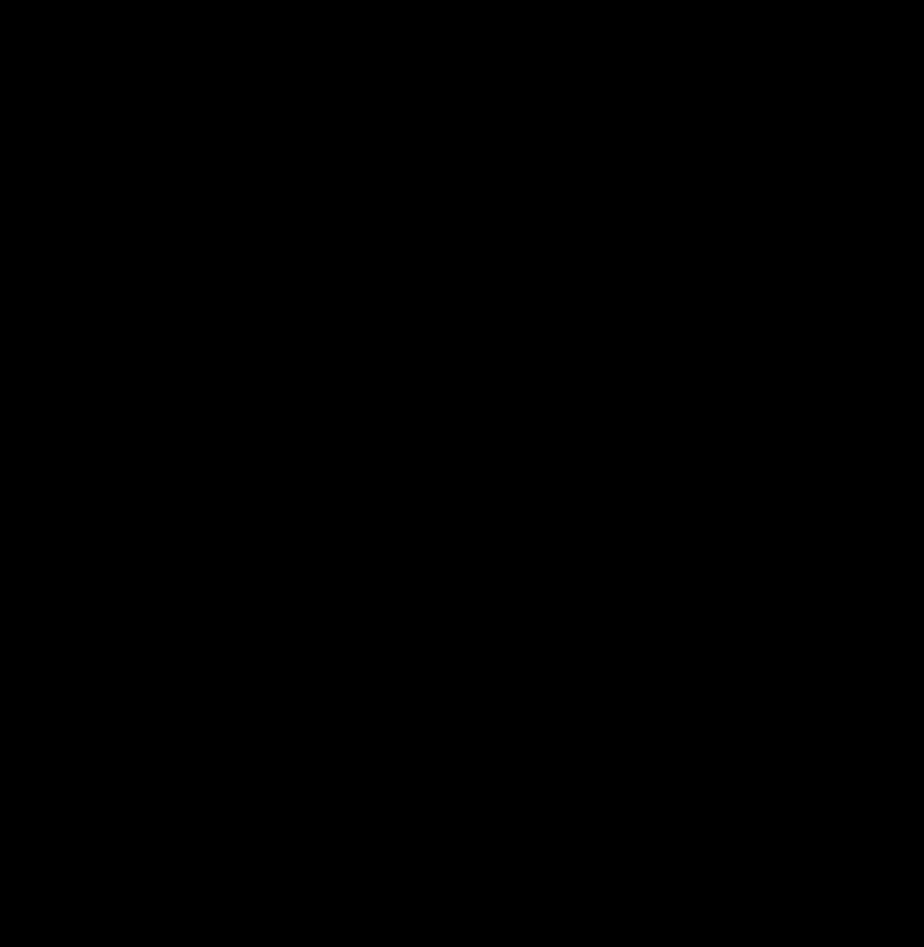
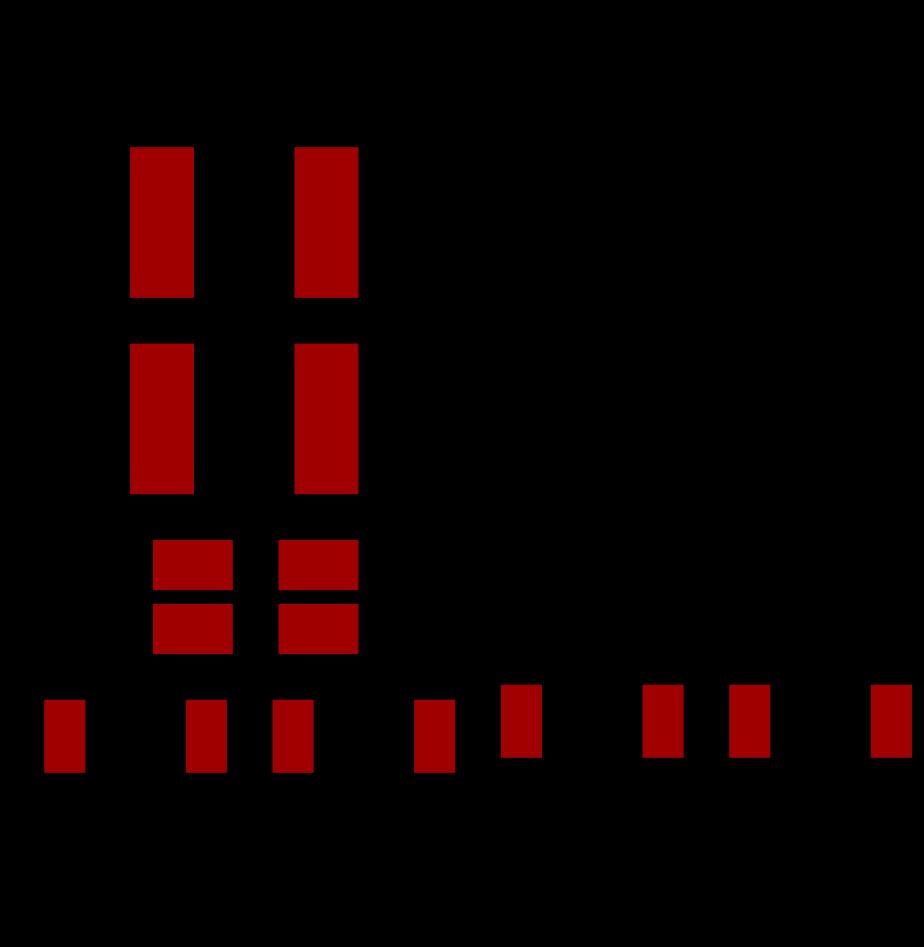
part: none -> (244, 320)
part: none -> (255, 597)
part: none -> (592, 721)
part: none -> (820, 721)
part: none -> (135, 736)
part: none -> (363, 736)

